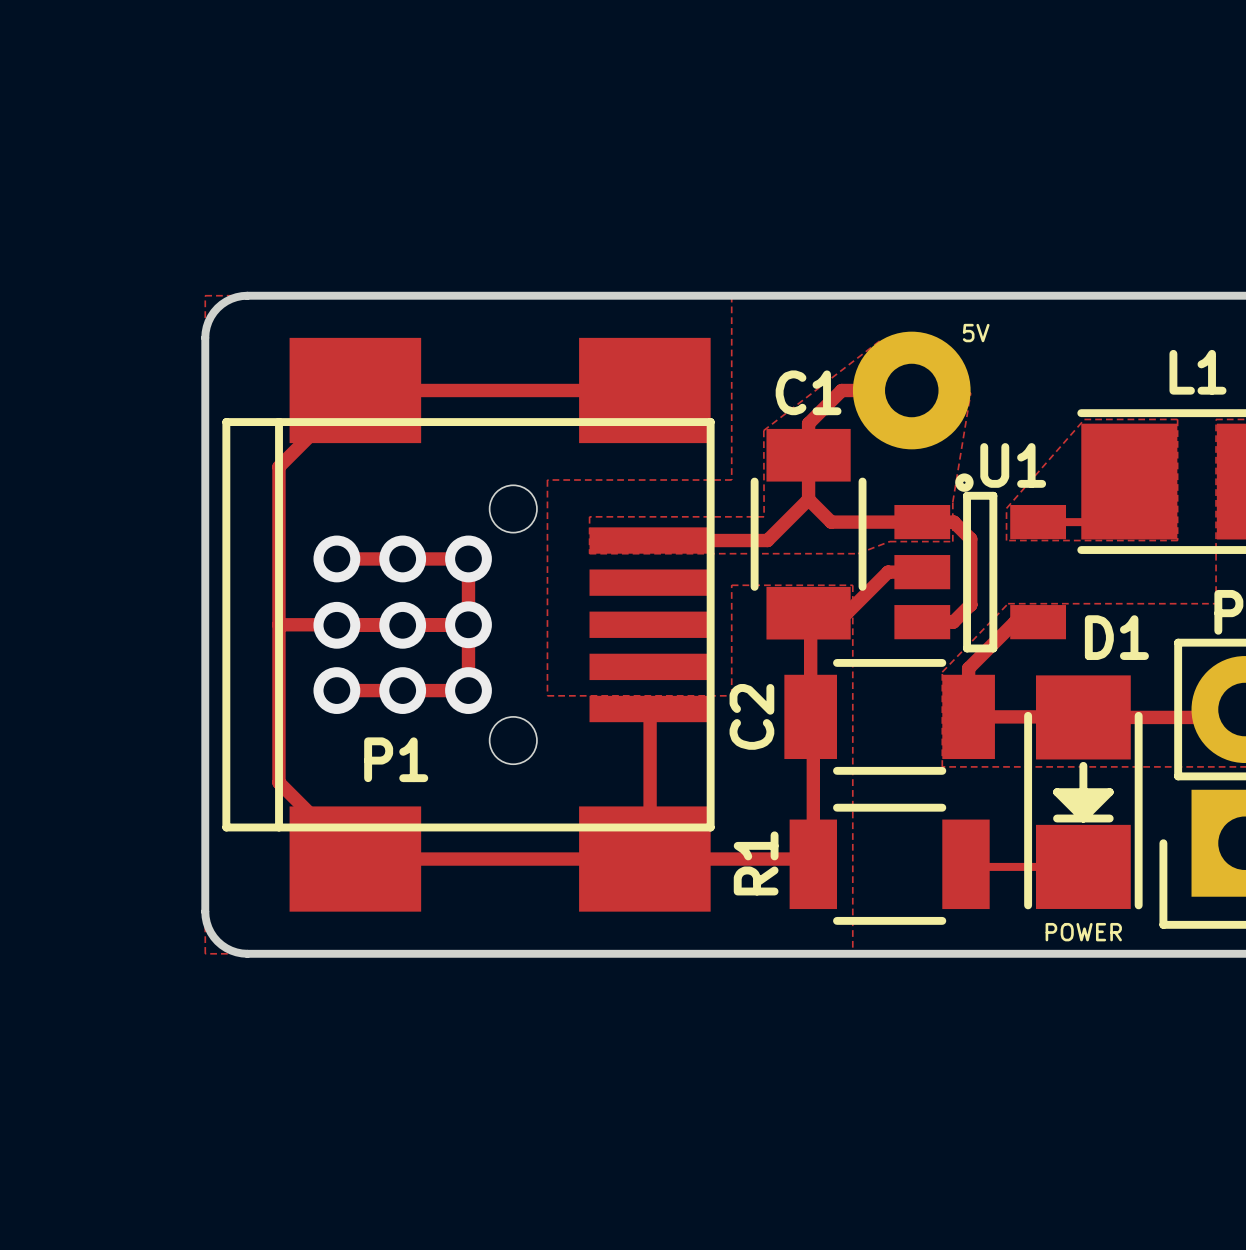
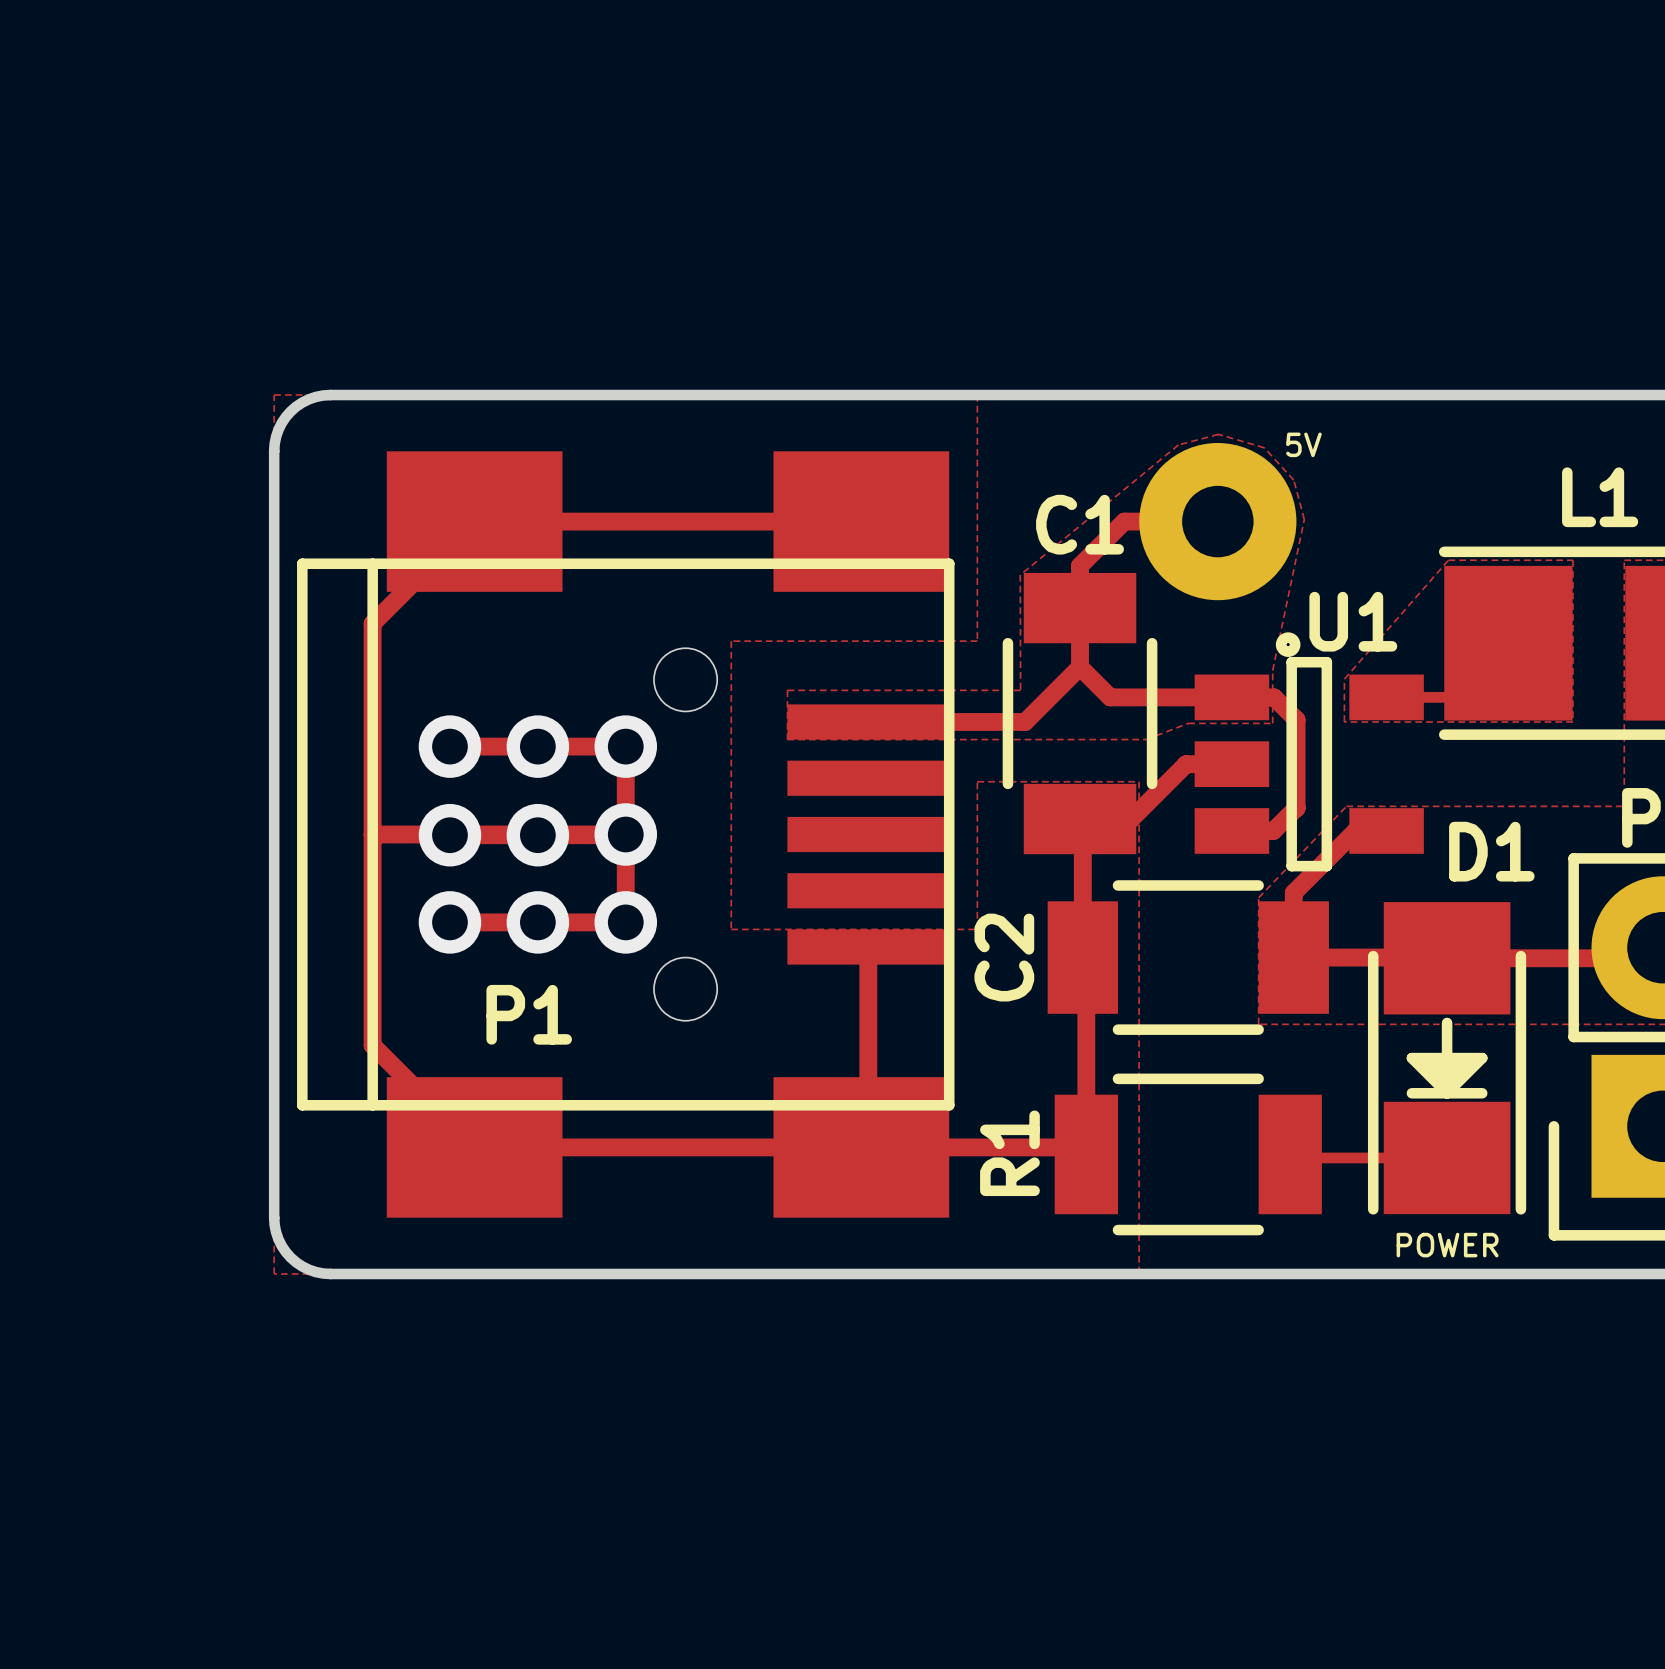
zone outline: (763, 430) (879, 341) (970, 393) (952, 502) -> (1020, 575) (1178, 444) (1218, 434) (1264, 447) (1293, 480) (1304, 519) (1272, 670)

